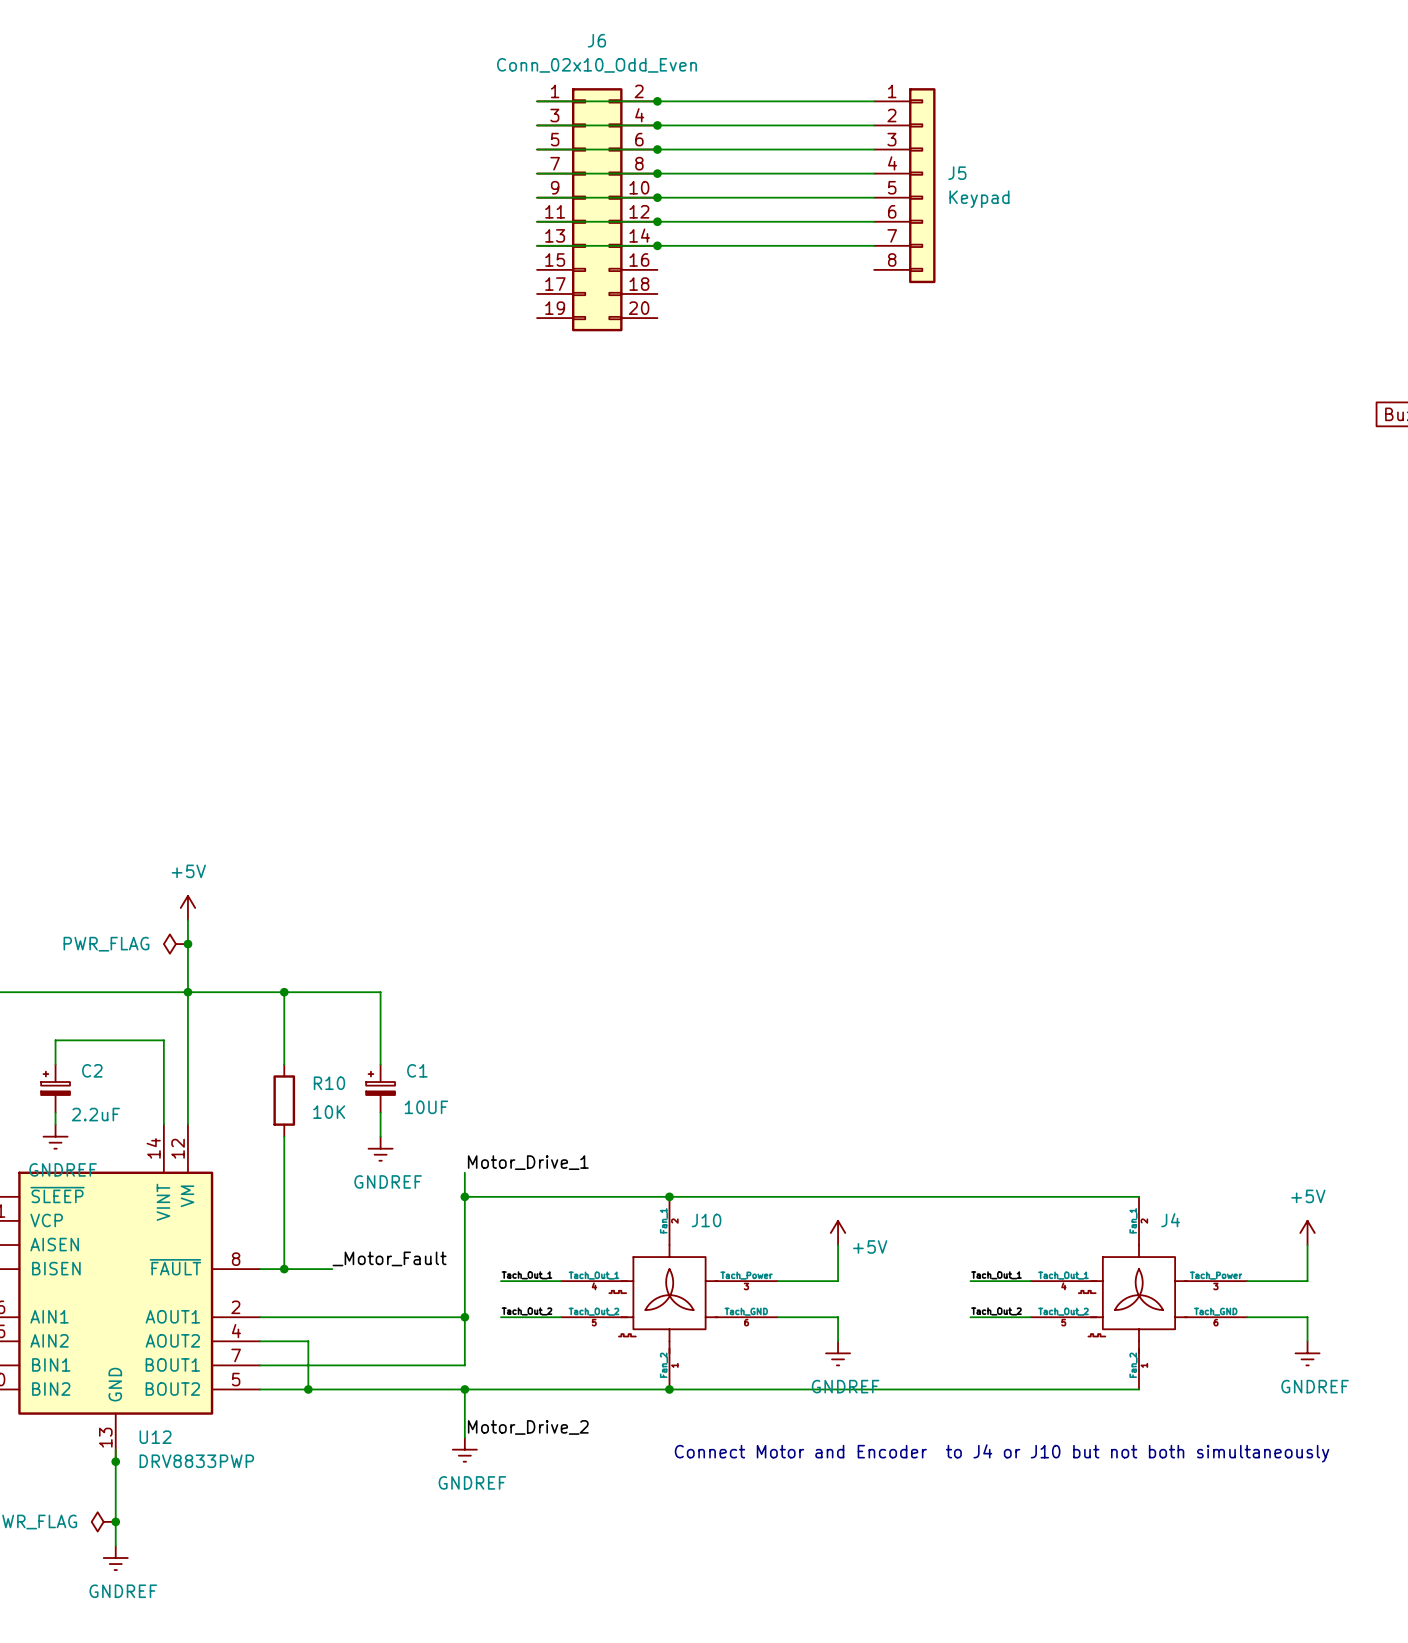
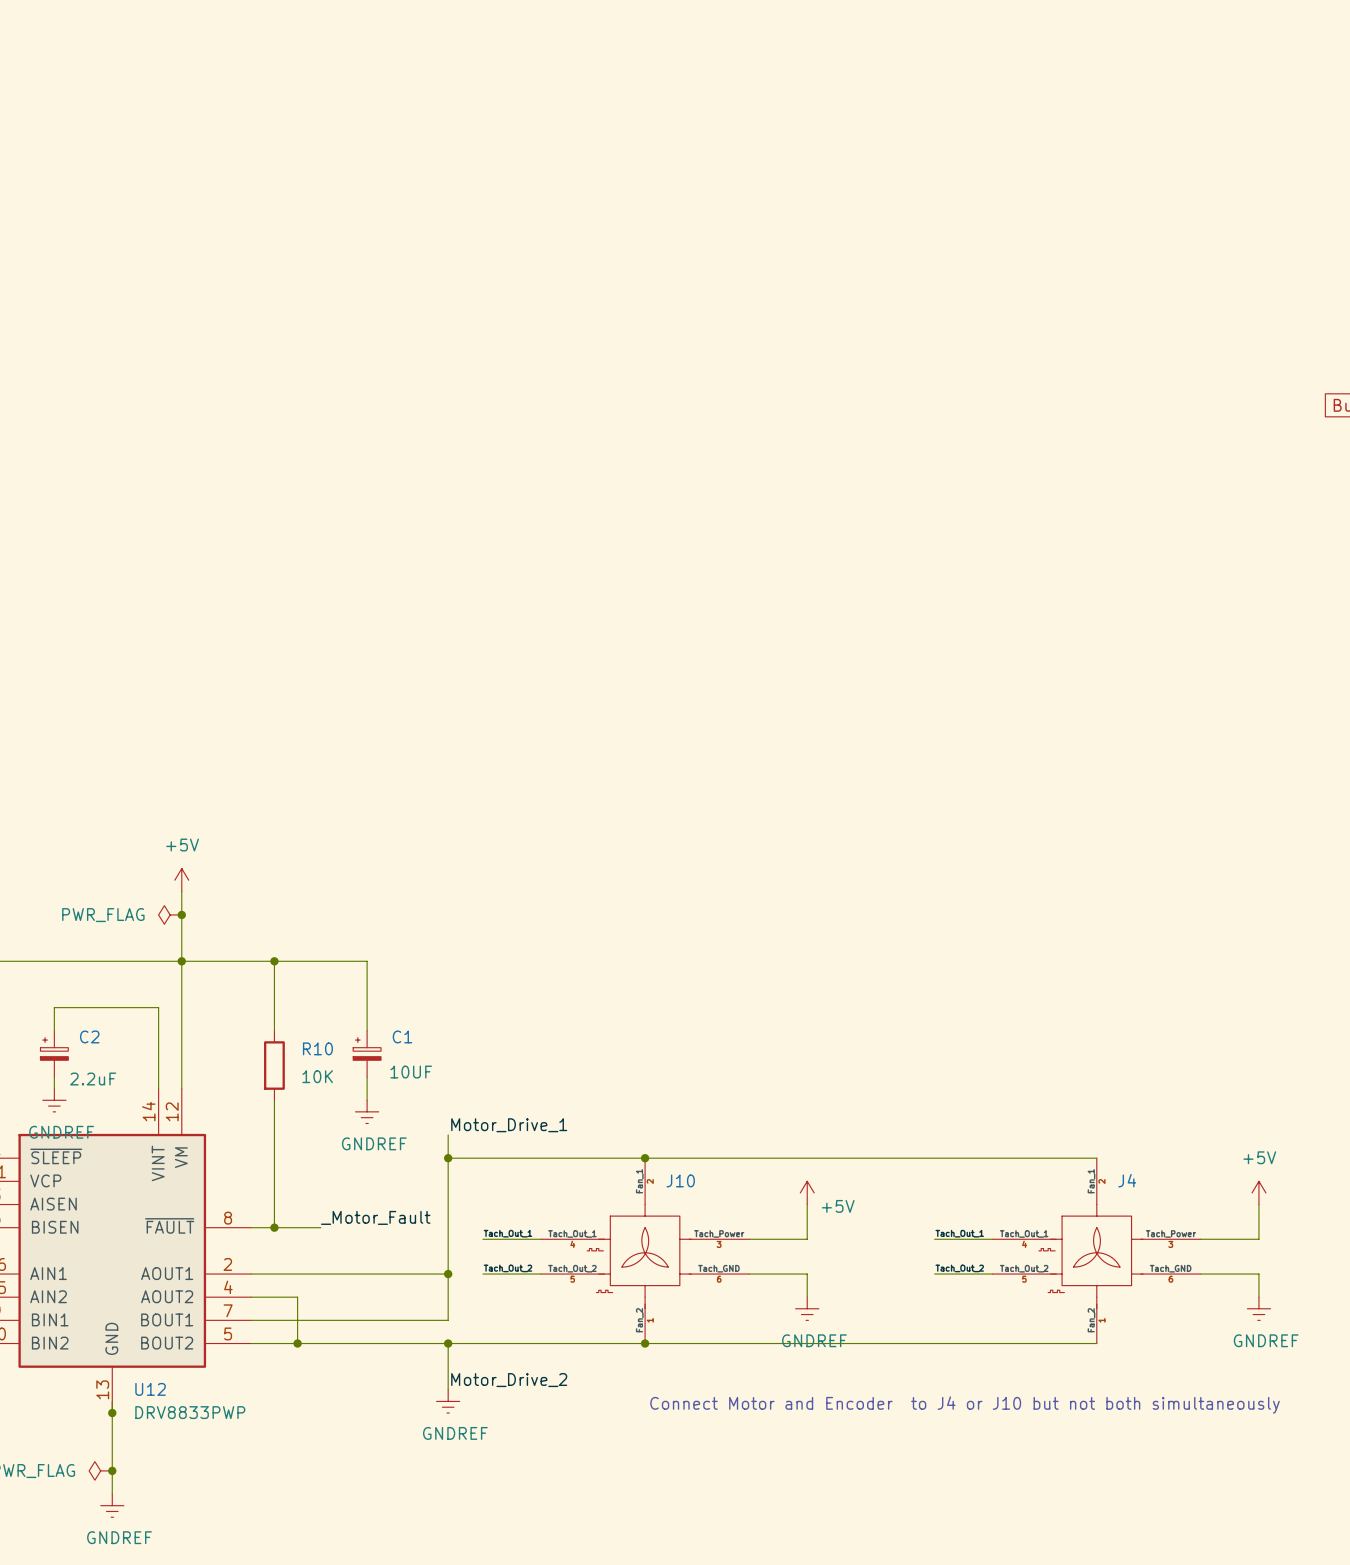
wire: (537, 101) (874, 101) -> none
junction: (657, 101) -> none
wire: (537, 125) (874, 125) -> none
junction: (657, 125) -> none
wire: (537, 149) (874, 149) -> none
junction: (657, 149) -> none
wire: (537, 173) (874, 173) -> none
junction: (657, 173) -> none
J5: Keypad (904, 185) -> none
wire: (537, 197) (874, 197) -> none
junction: (657, 197) -> none
J6: Conn_02x10_Odd_Even (597, 209) -> none
wire: (537, 221) (874, 221) -> none
junction: (657, 221) -> none
wire: (537, 245) (874, 245) -> none
junction: (657, 245) -> none

